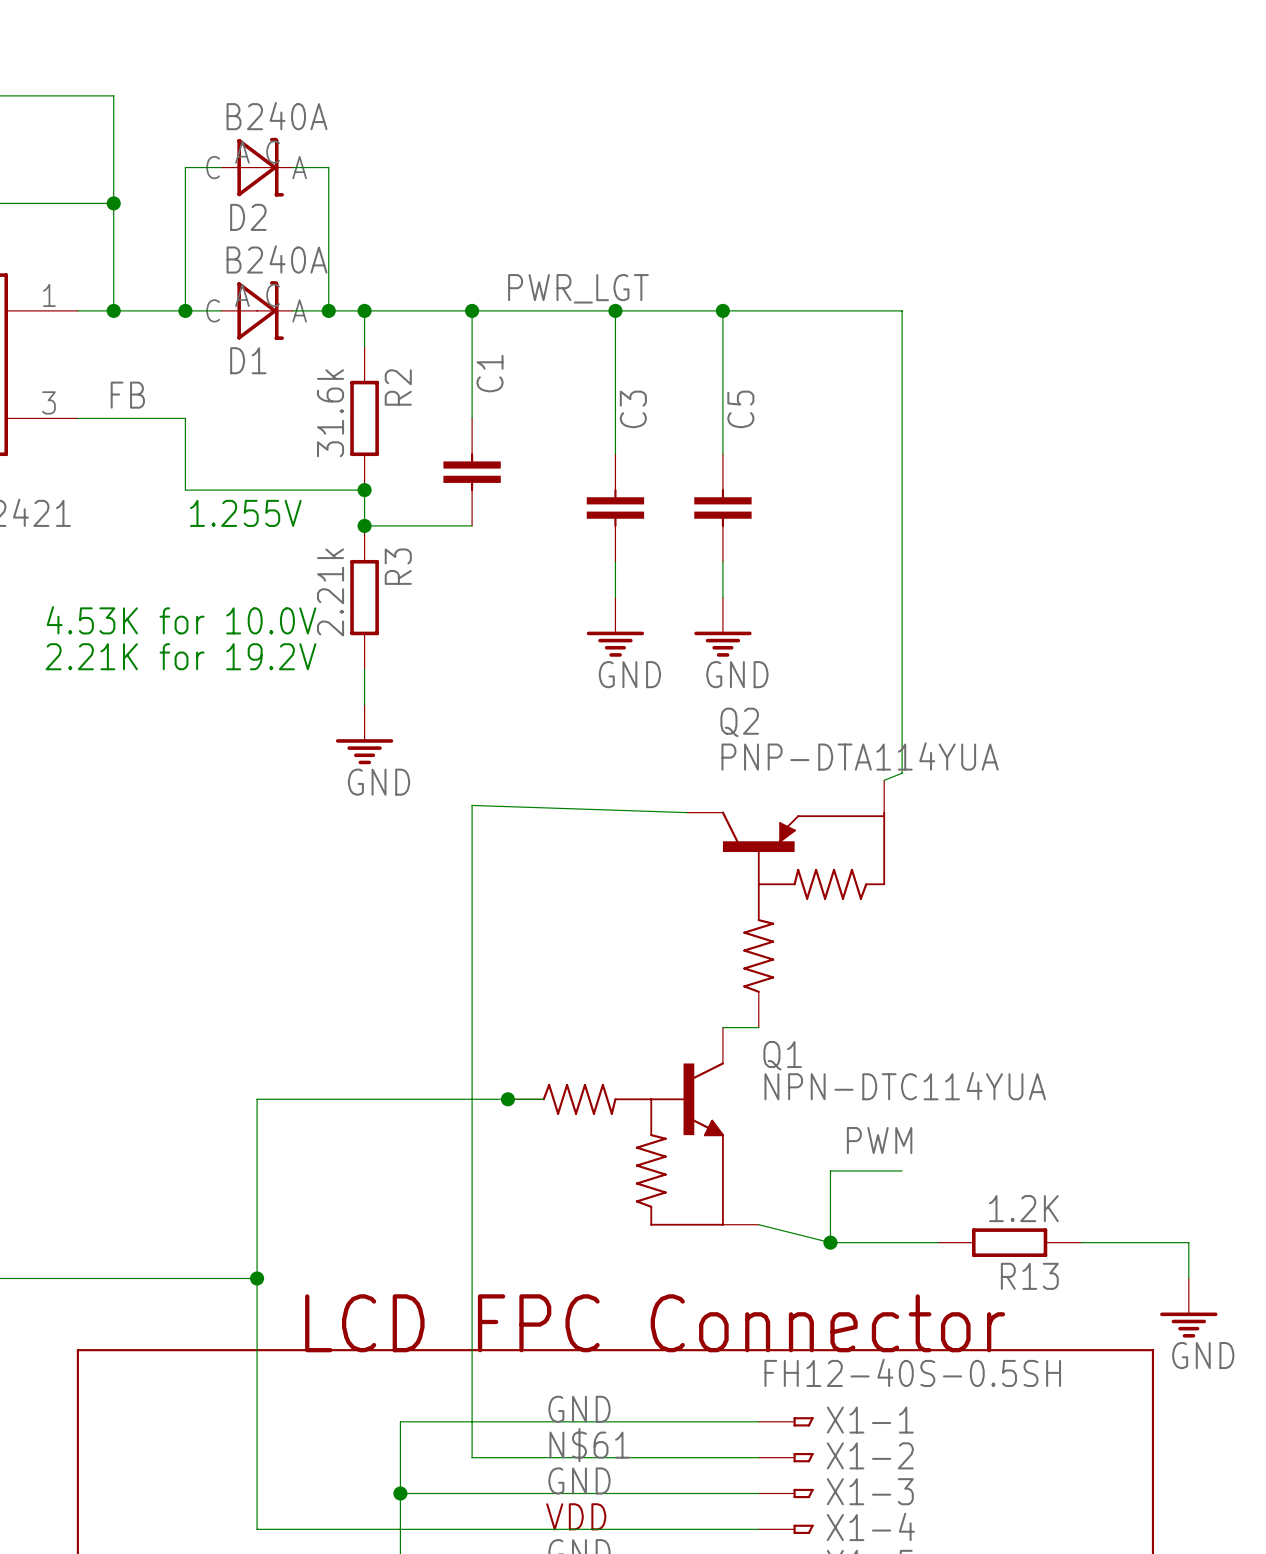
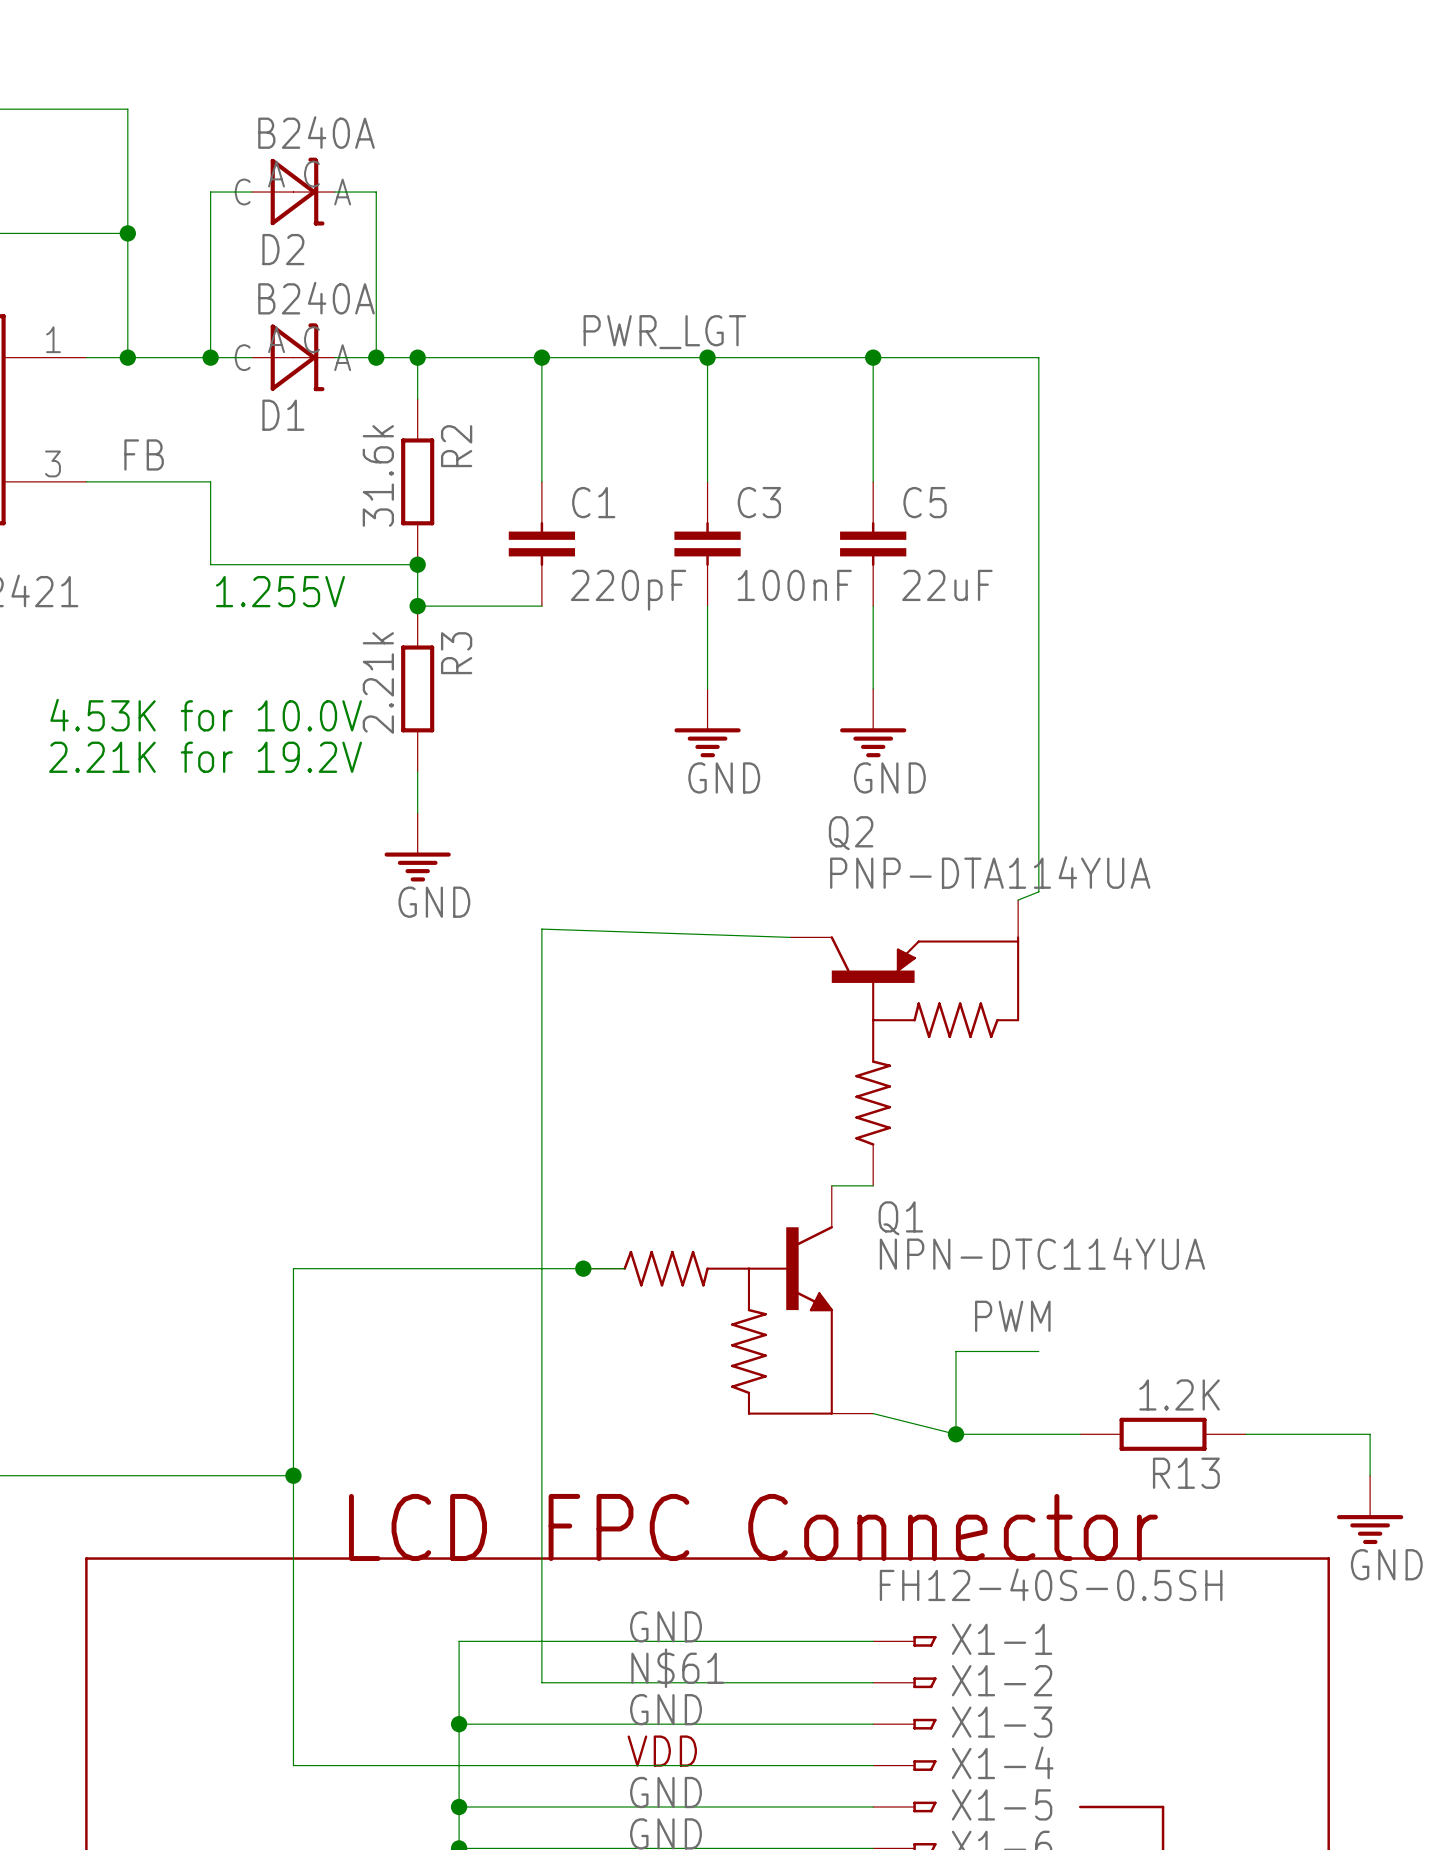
wire: (722, 310) (722, 454) -> none
junction position: (722, 310) -> (873, 357)
wire: none -> (873, 357) (873, 481)
C1 name rotation: 0° (490, 373) -> 90° clockwise (593, 502)
C1 name position: C1 (490, 373) -> C1 (593, 502)
C3 name rotation: 0° (633, 409) -> 90° clockwise (759, 502)
C5 name rotation: 0° (740, 409) -> 90° clockwise (925, 502)
C5 name position: C5 (740, 409) -> C5 (925, 502)
C3 position: (615, 508) -> (707, 543)
C3 value: none -> 100nF (794, 585)
C5 position: (722, 508) -> (873, 543)
C5 value: none -> 22uF (947, 585)
C1 value: none -> 220pF (628, 590)
wire: none -> (873, 606) (873, 688)
wire: (722, 561) (722, 597) -> none
power symbol position: GND (722, 627) -> GND (873, 723)

